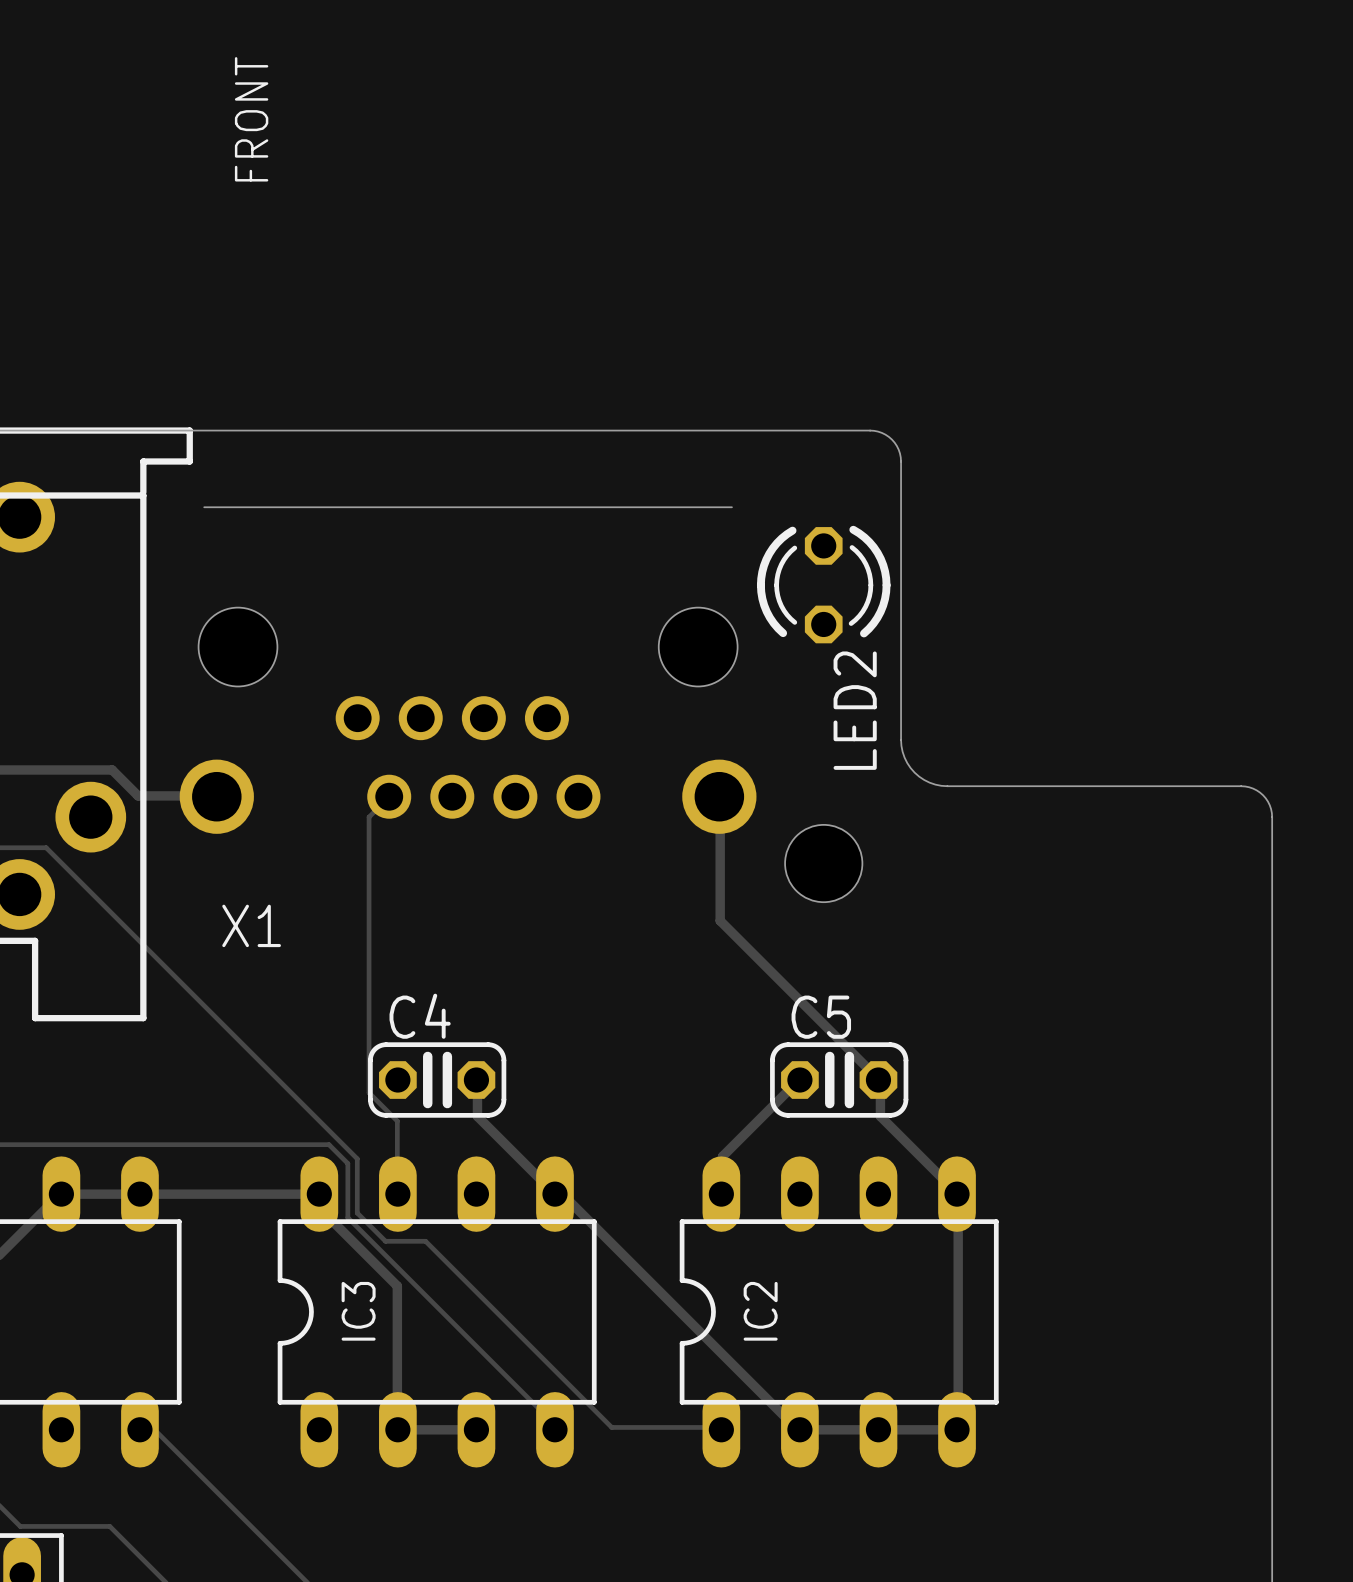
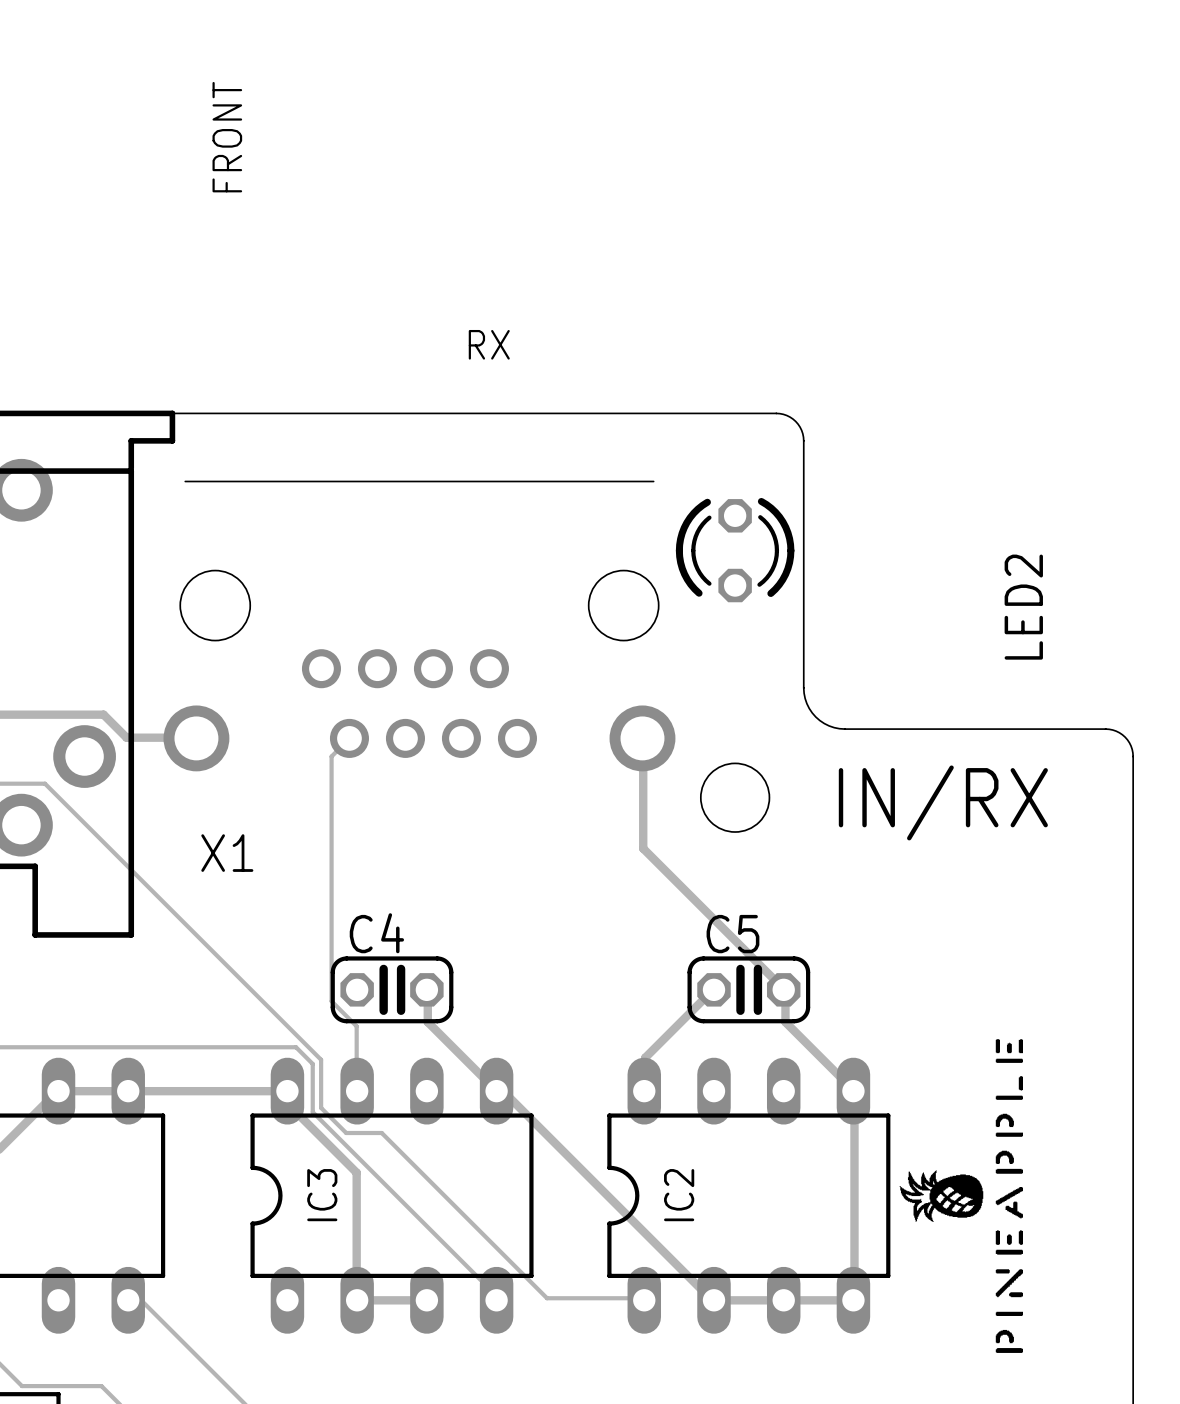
text: none -> RX (489, 344)
LED2 name position: LED2 (855, 710) -> LED2 (1023, 607)
text: none -> IN/RX (943, 802)
drawing: none -> [899, 1039, 1023, 1353]

